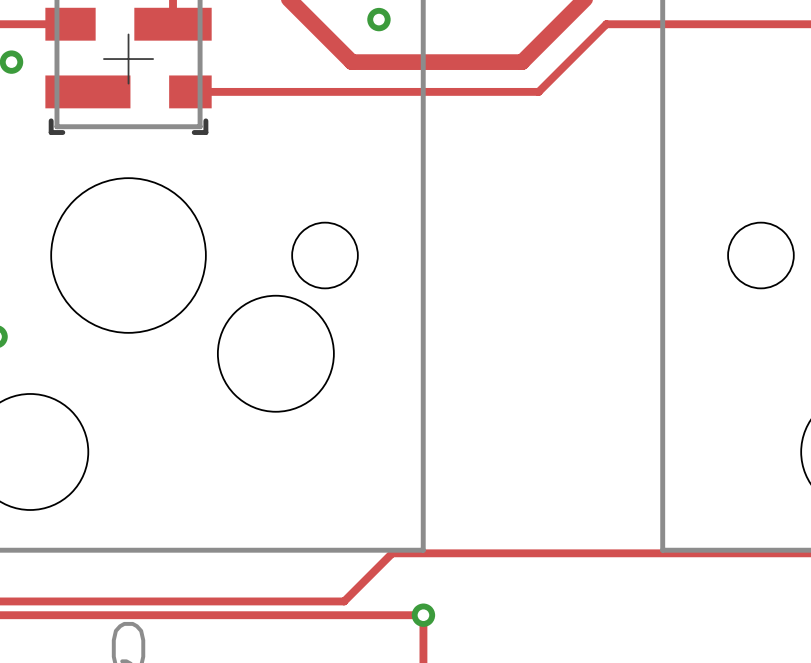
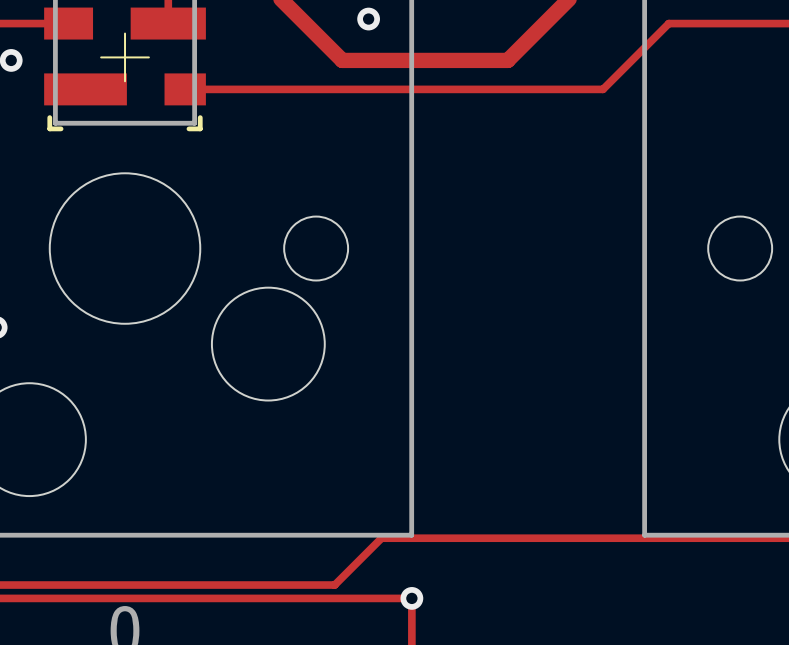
track: (687, 24) (606, 24) (538, 91) -> (668, 23) (602, 89) (523, 89)

